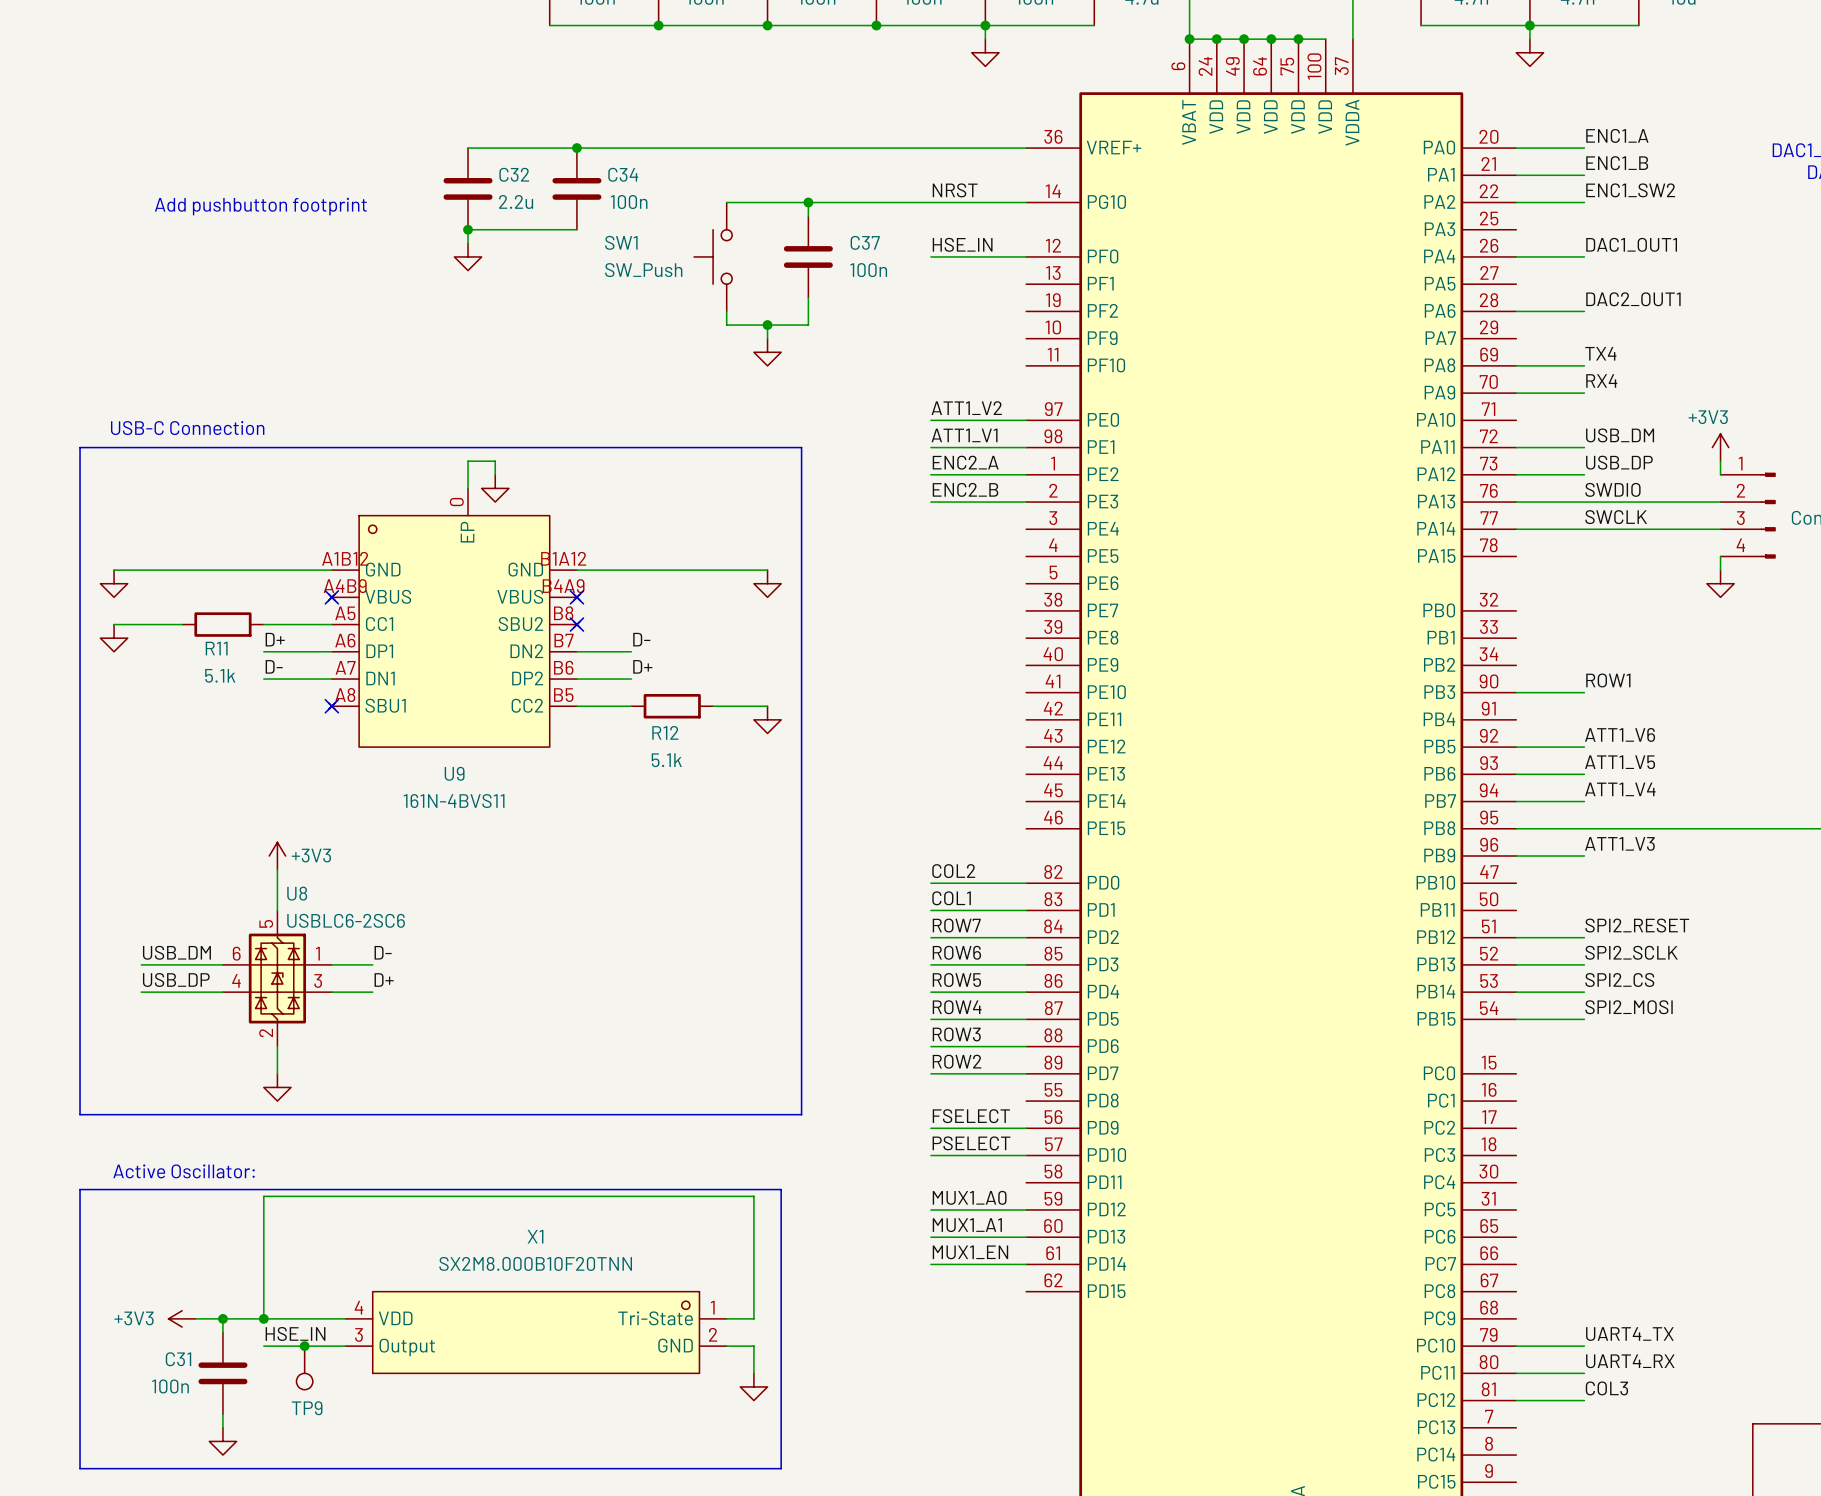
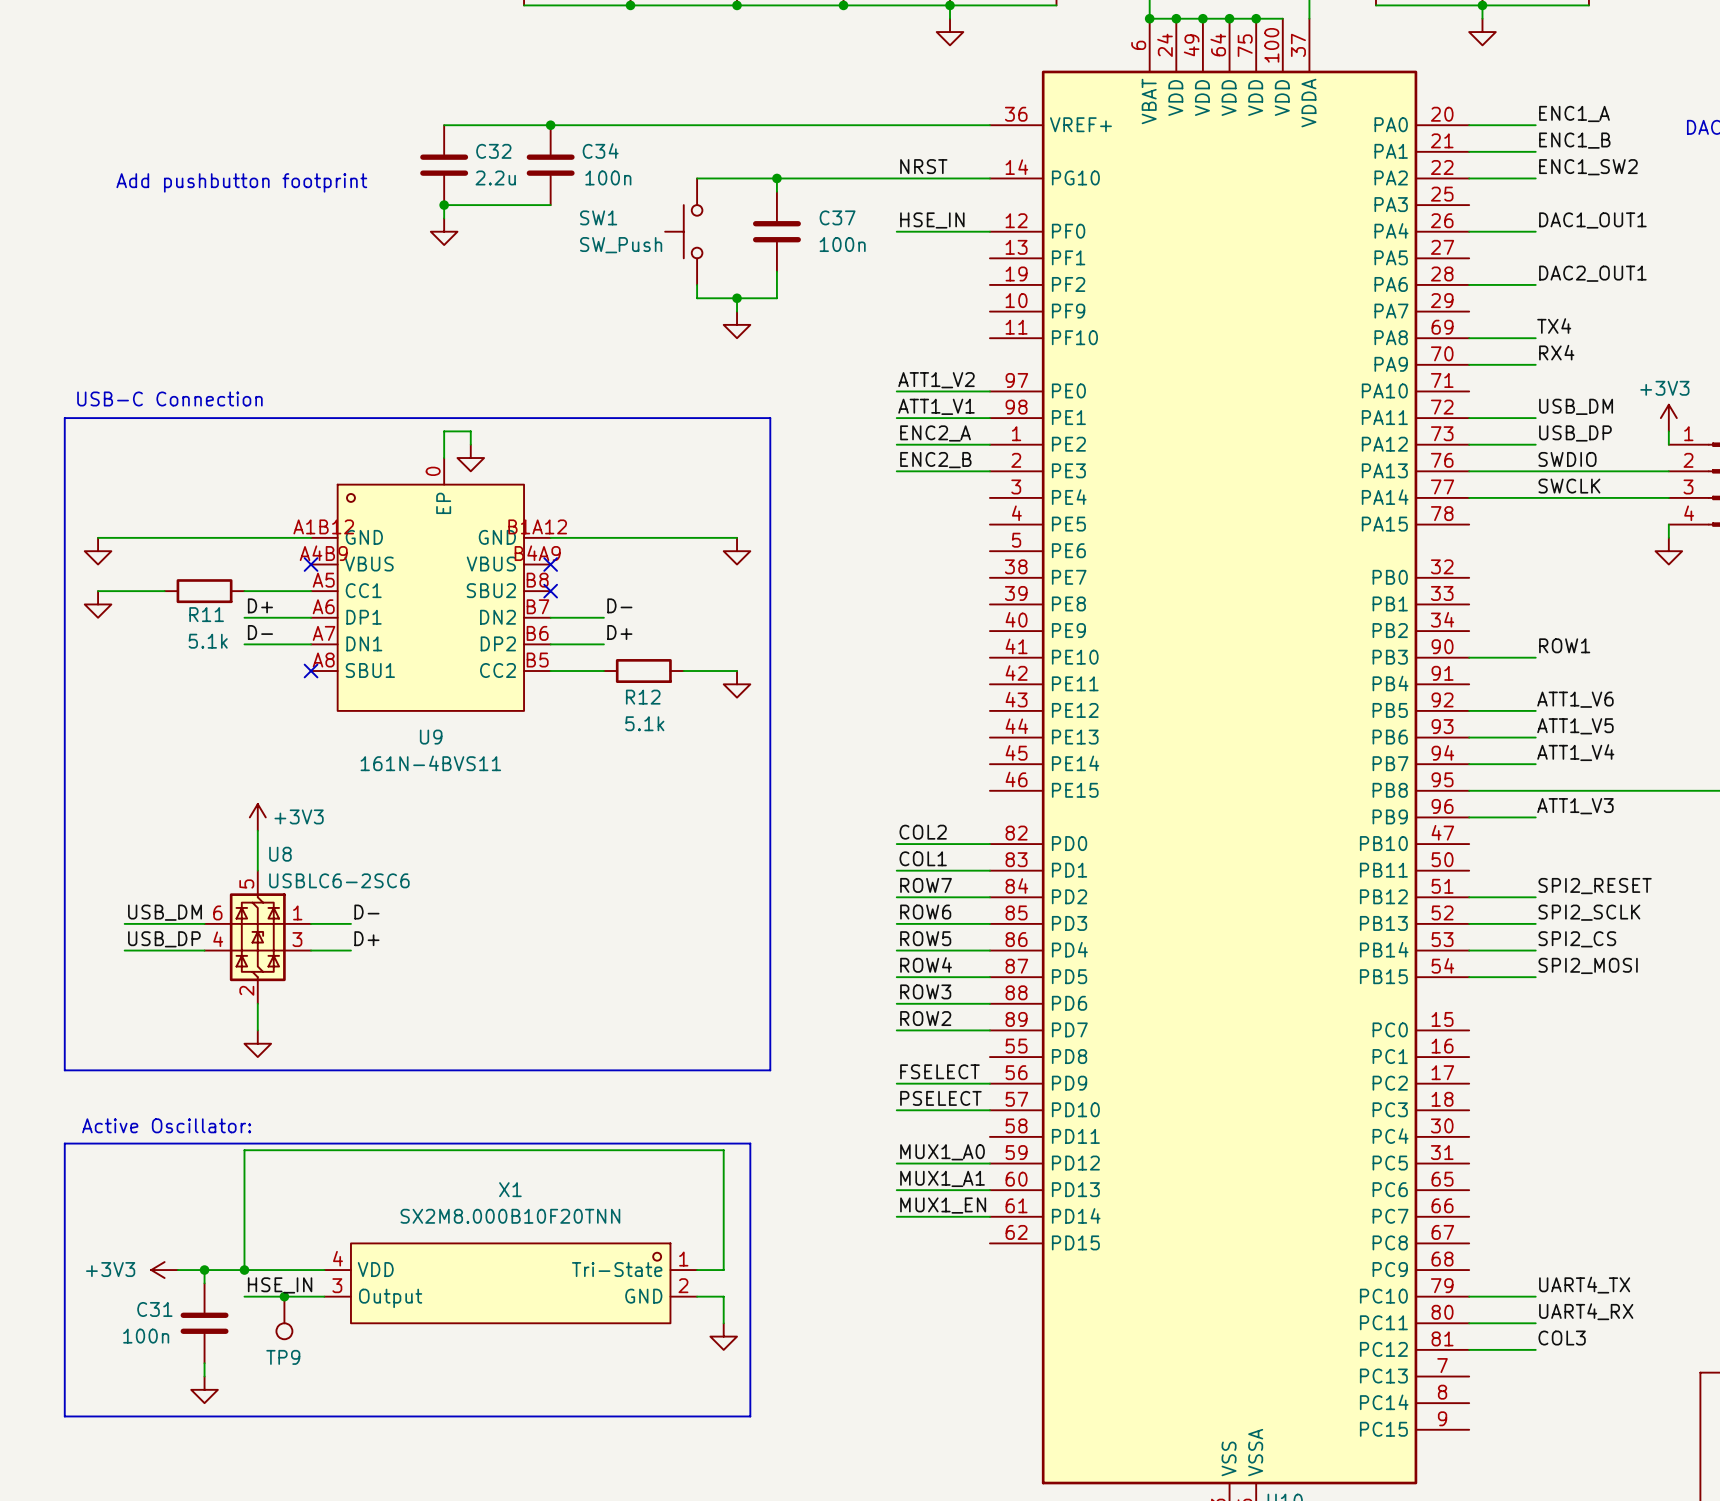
U9 symbol: [328, 488, 581, 748] -> [311, 458, 551, 711]

